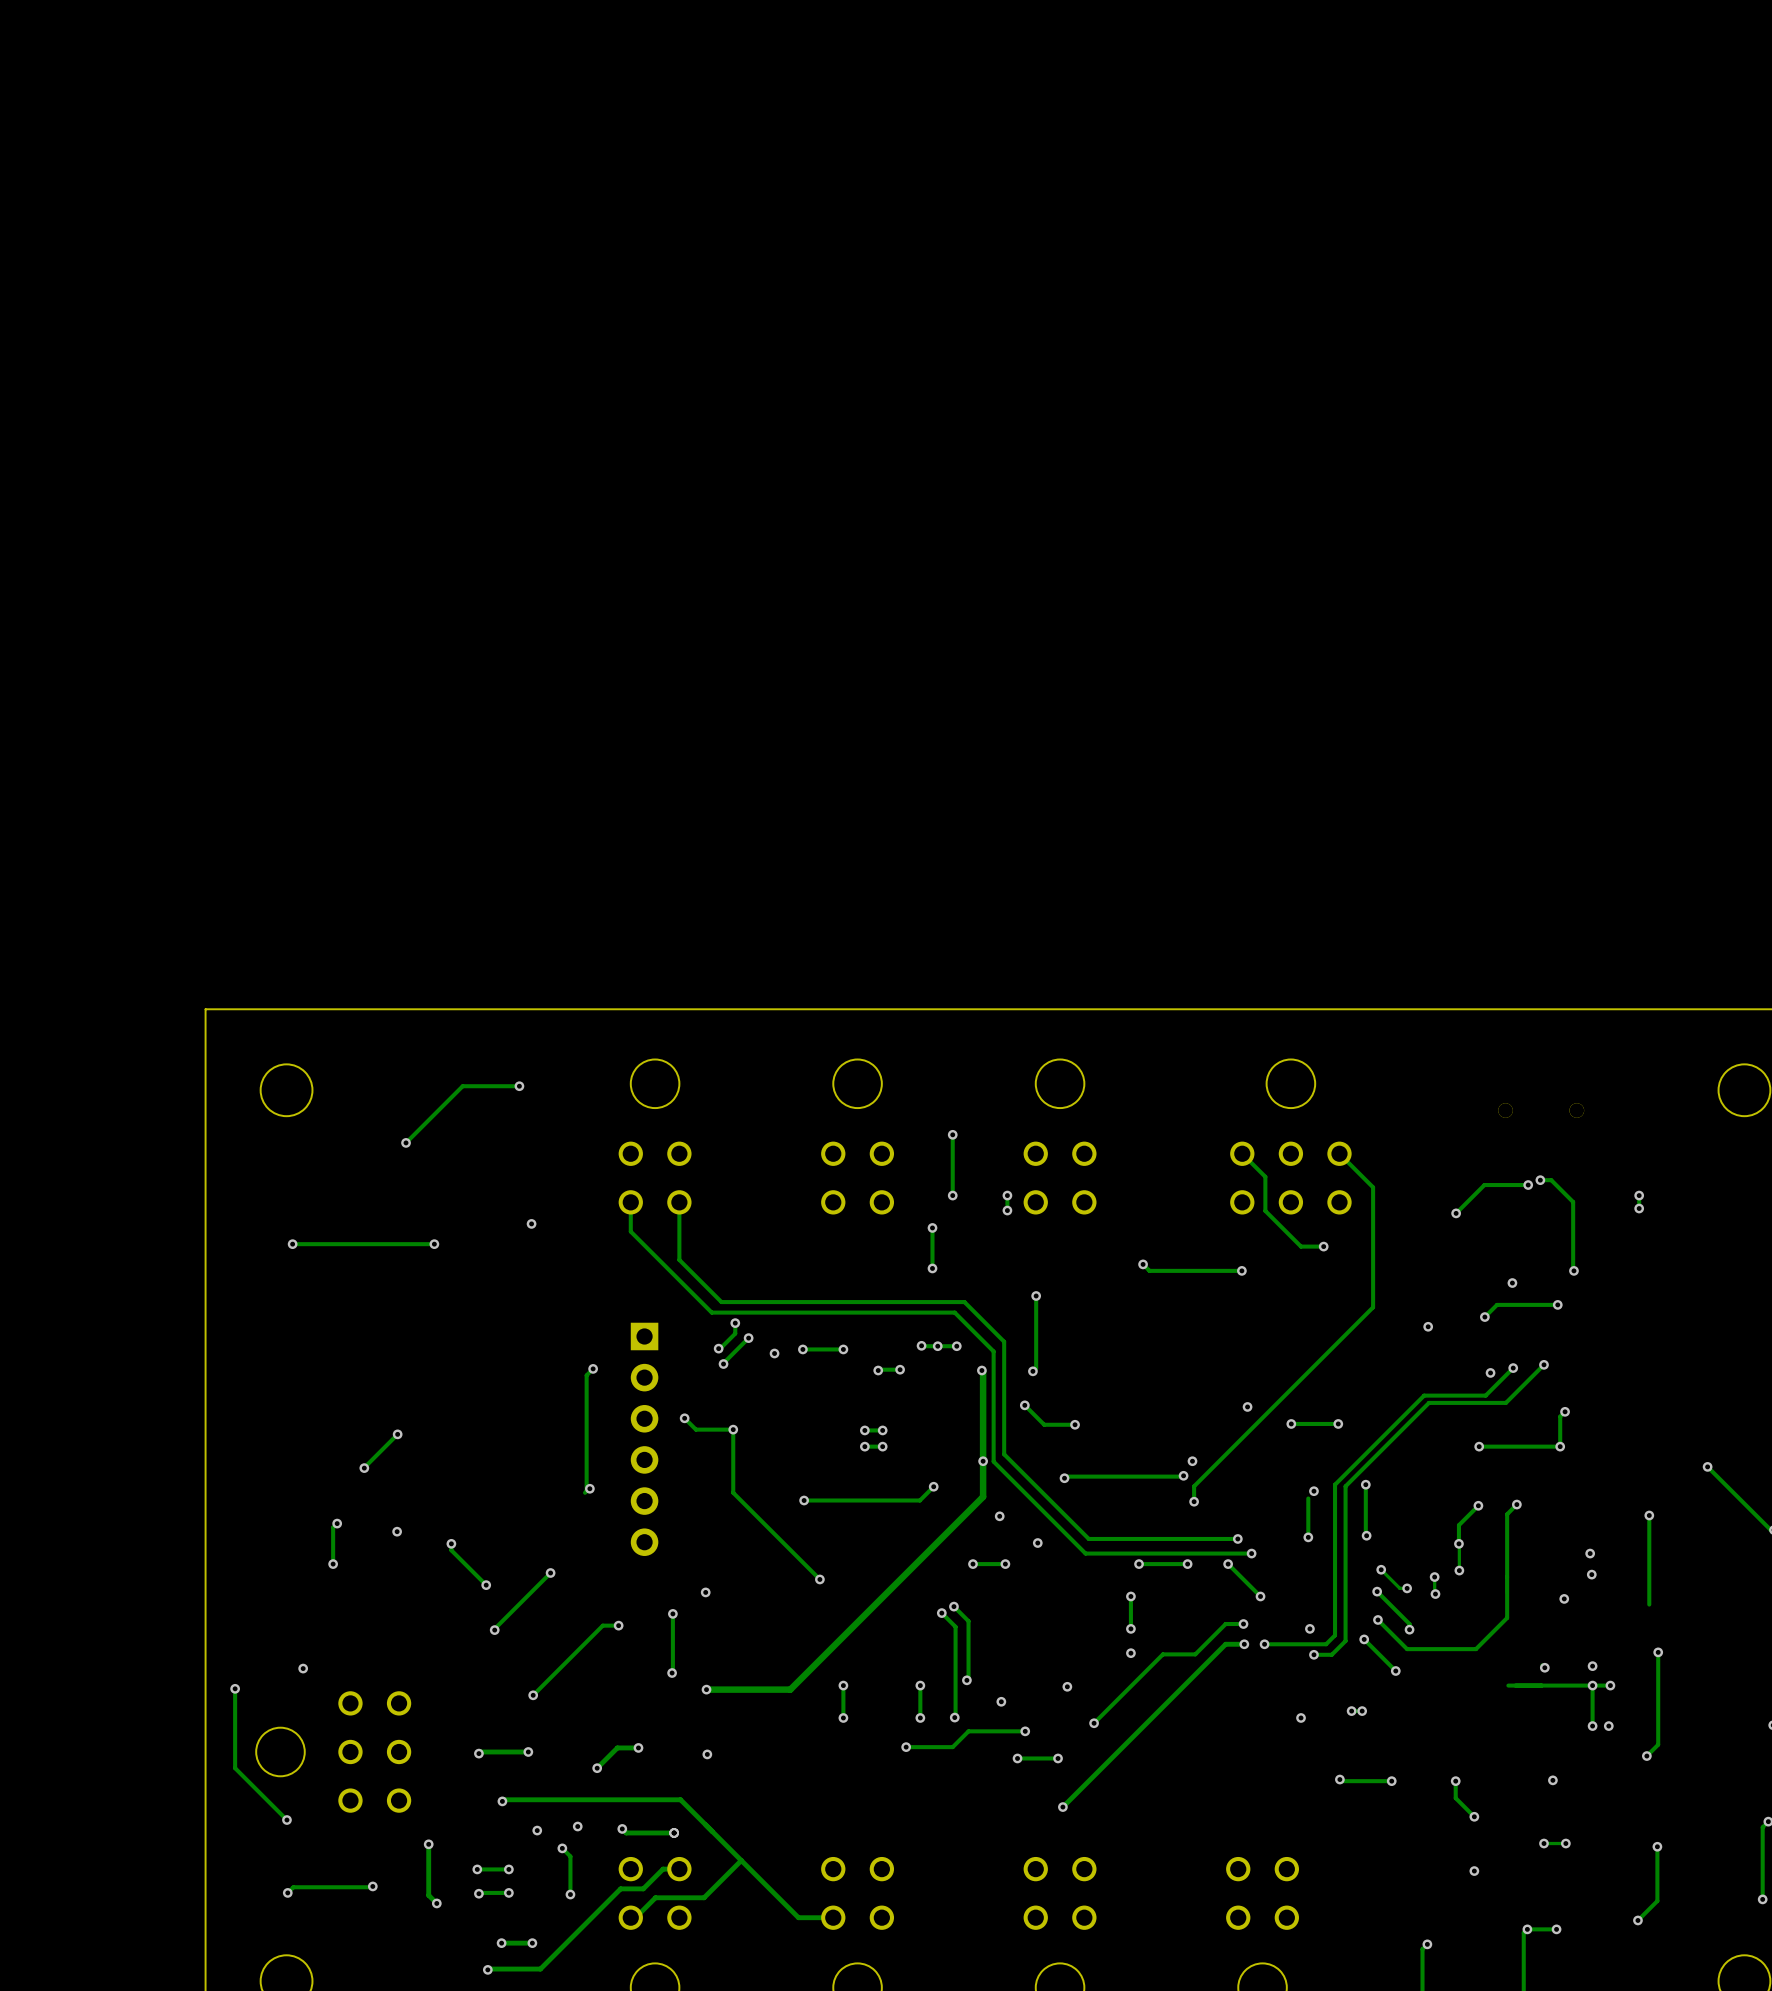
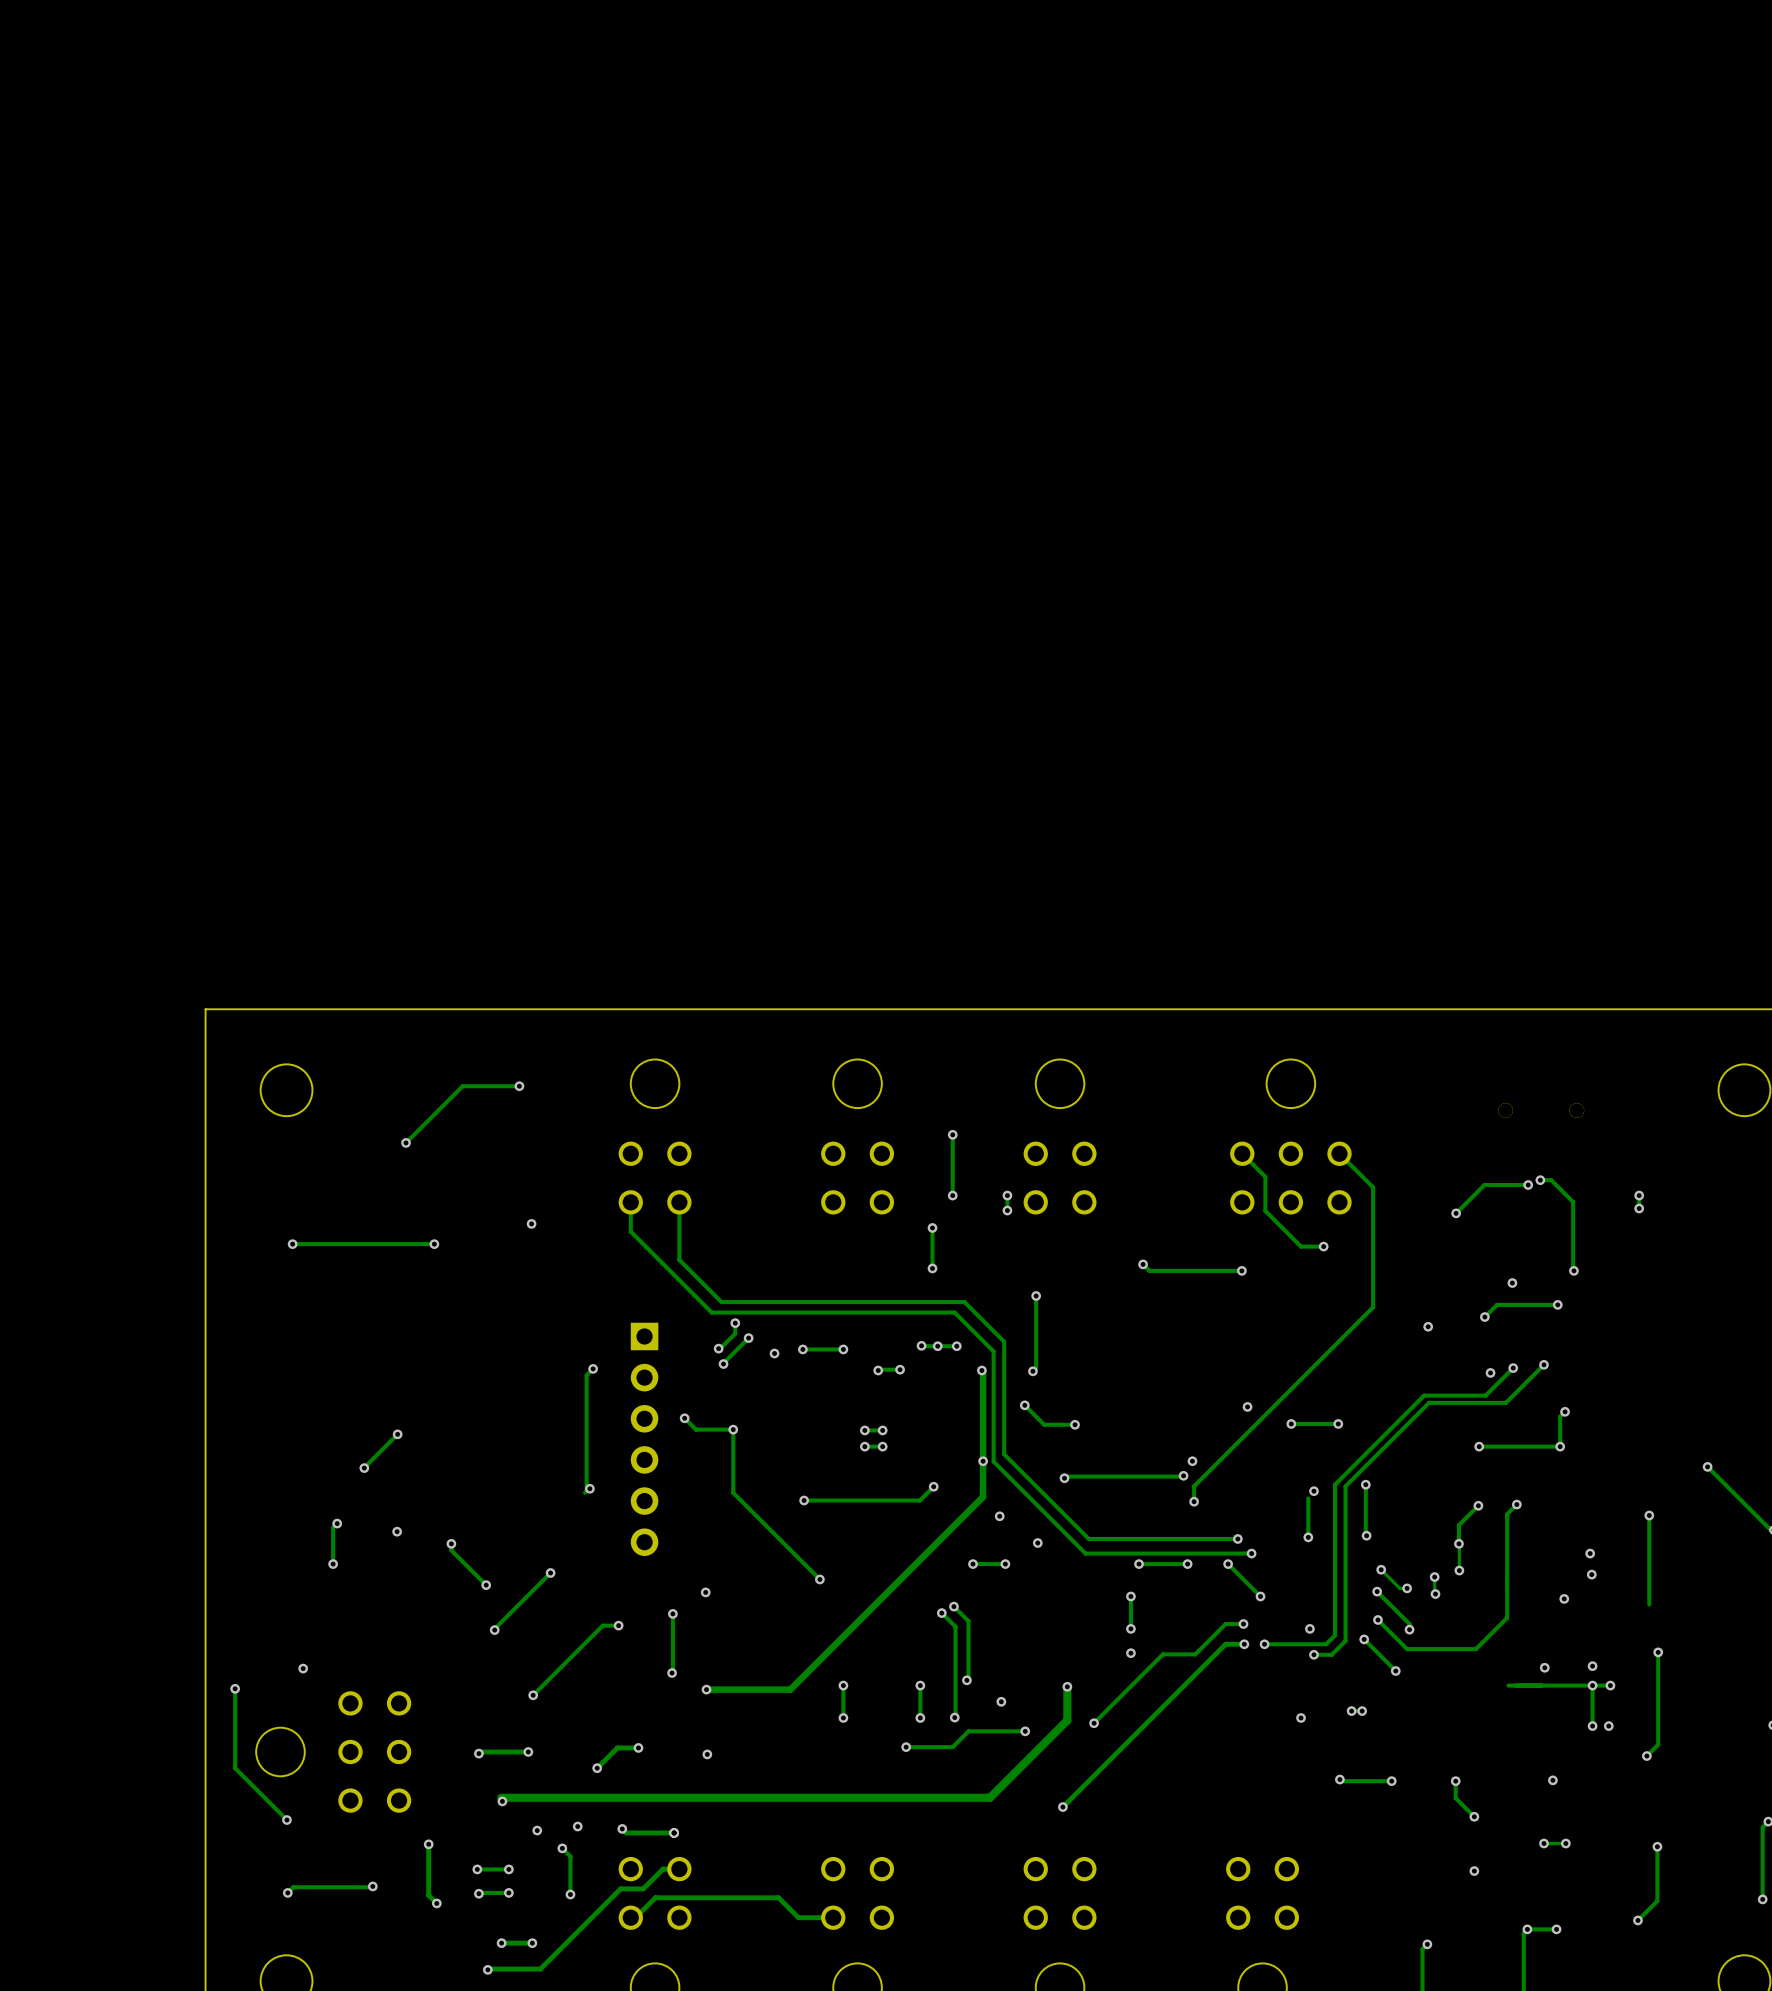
track: none -> (1067, 1686) (1067, 1720) (990, 1797) (501, 1797)
via: (1017, 1758) -> none
track: (1058, 1758) (1017, 1758) -> none
via: (1058, 1758) -> none
track: (502, 1801) (504, 1799) (680, 1799) (778, 1897) -> none
track: (741, 1860) (704, 1897) -> (778, 1897) (704, 1897)

